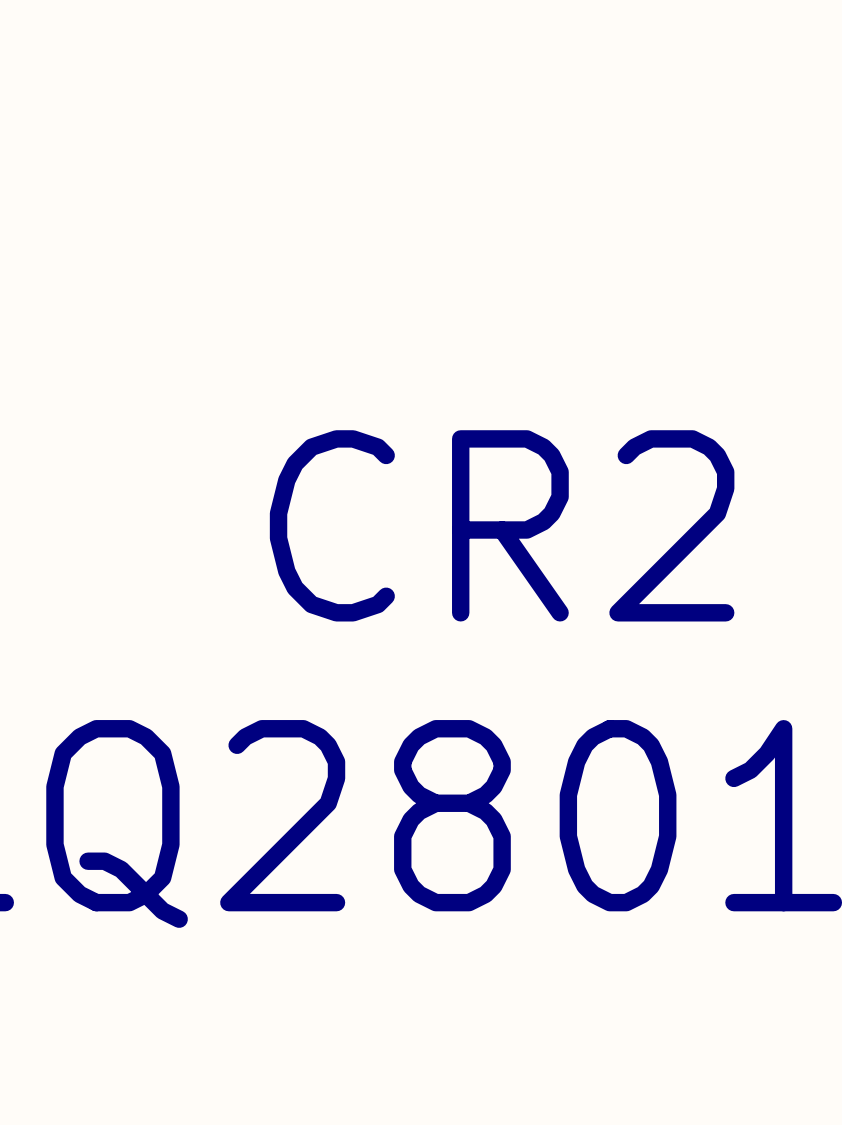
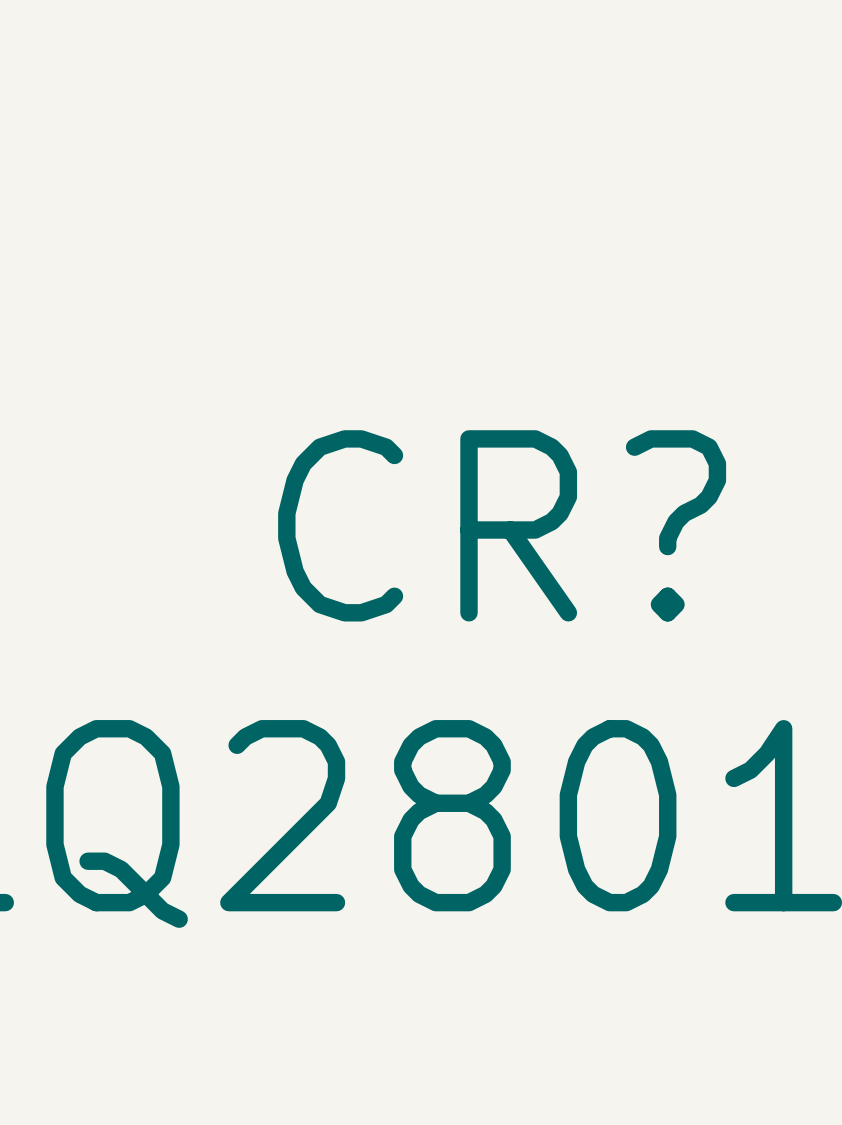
CR2 name: CR2 (502, 525) -> CR? (502, 525)

